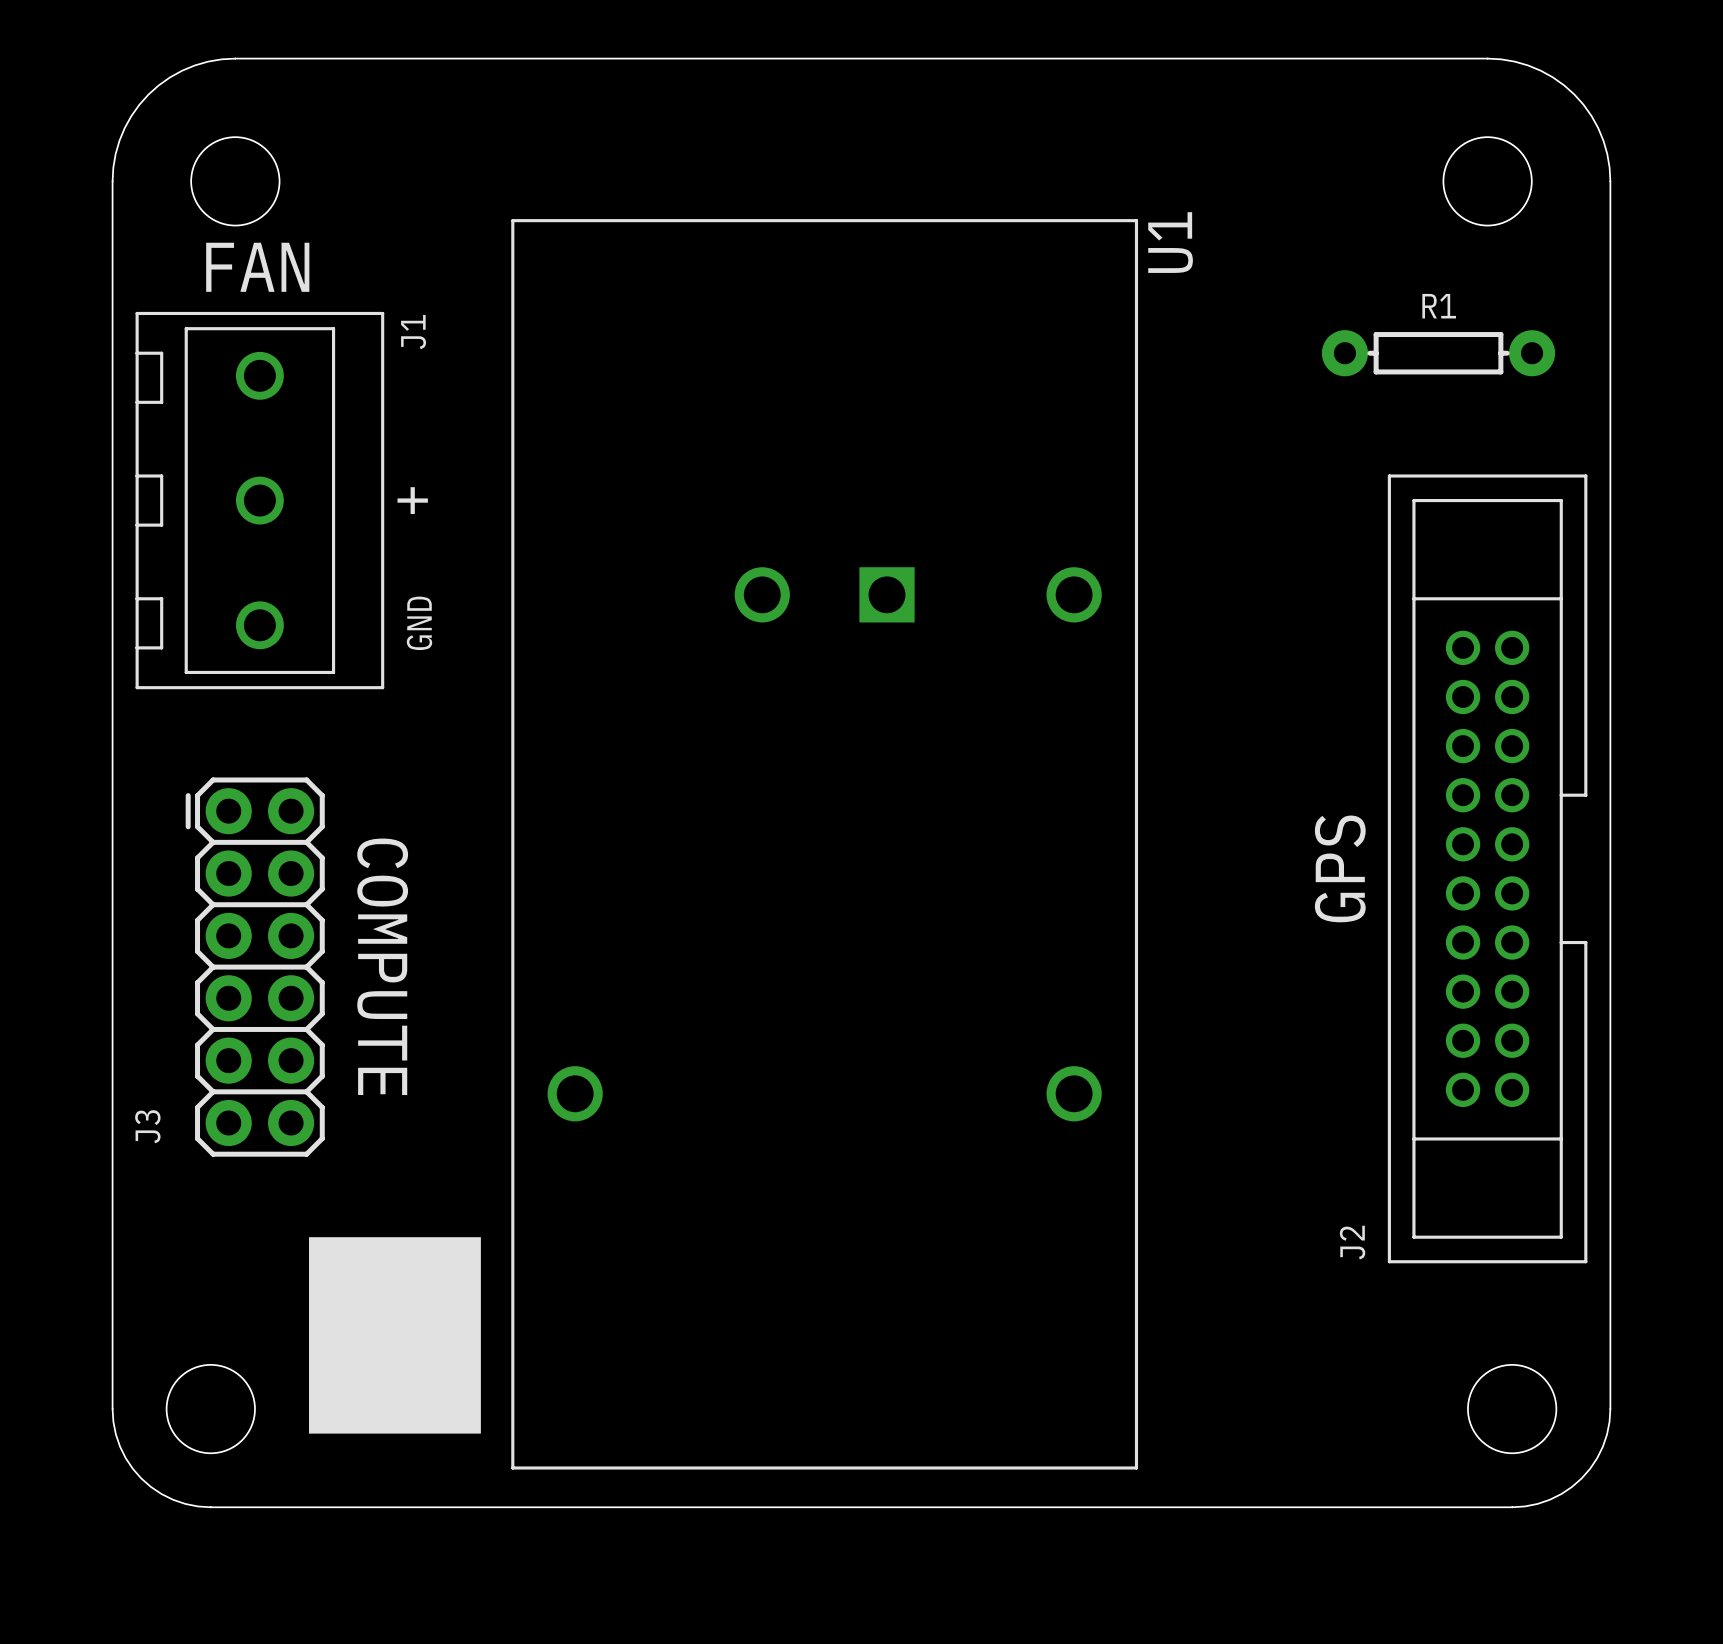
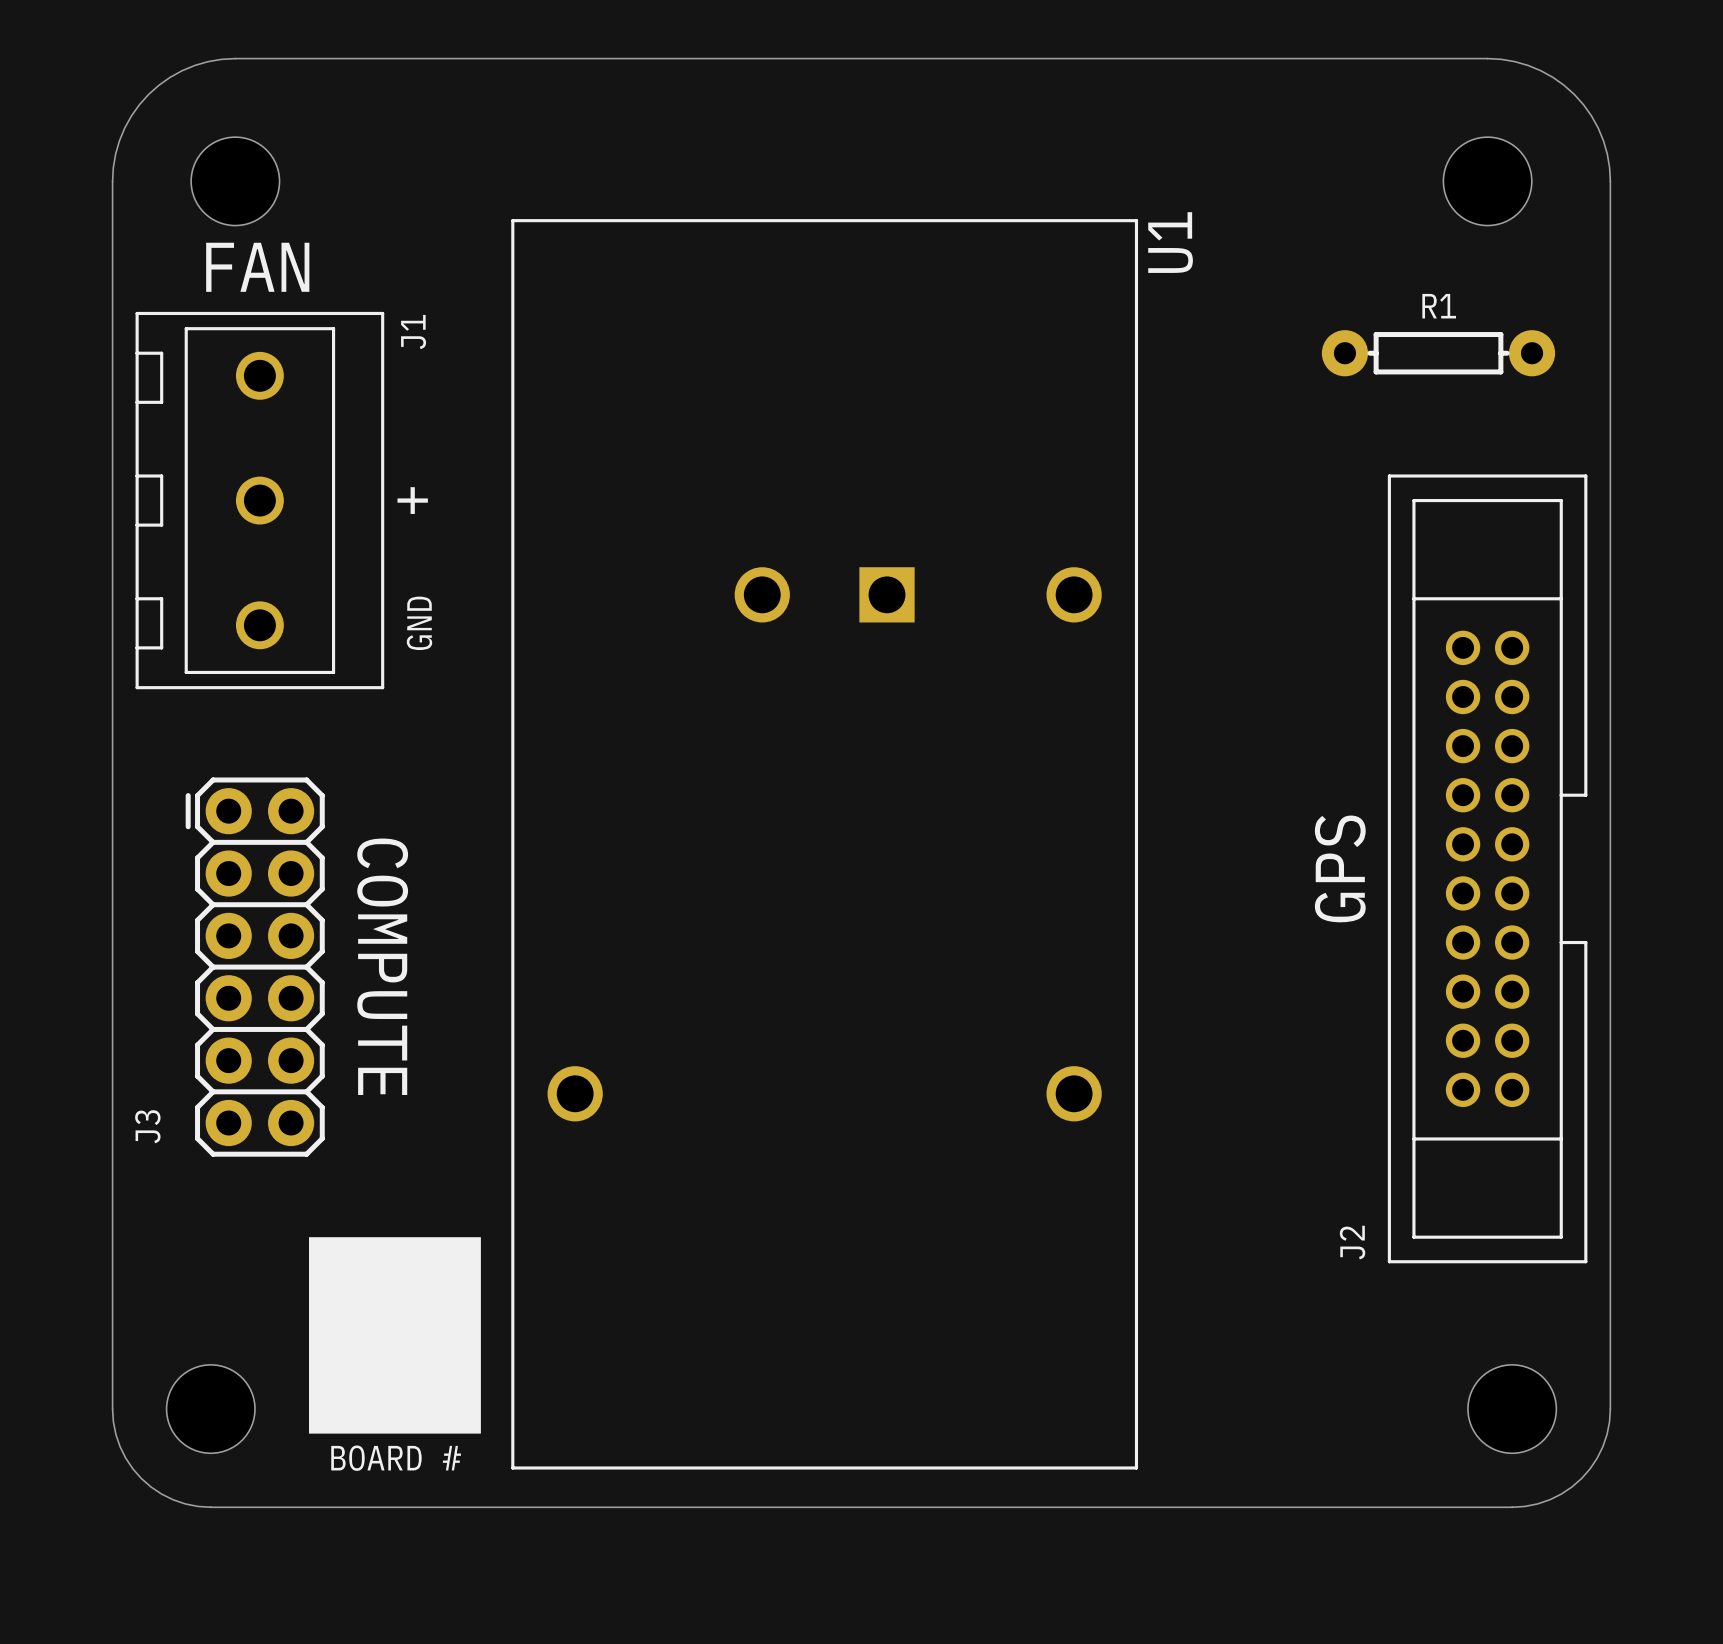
text: none -> BOARD # (396, 1458)

